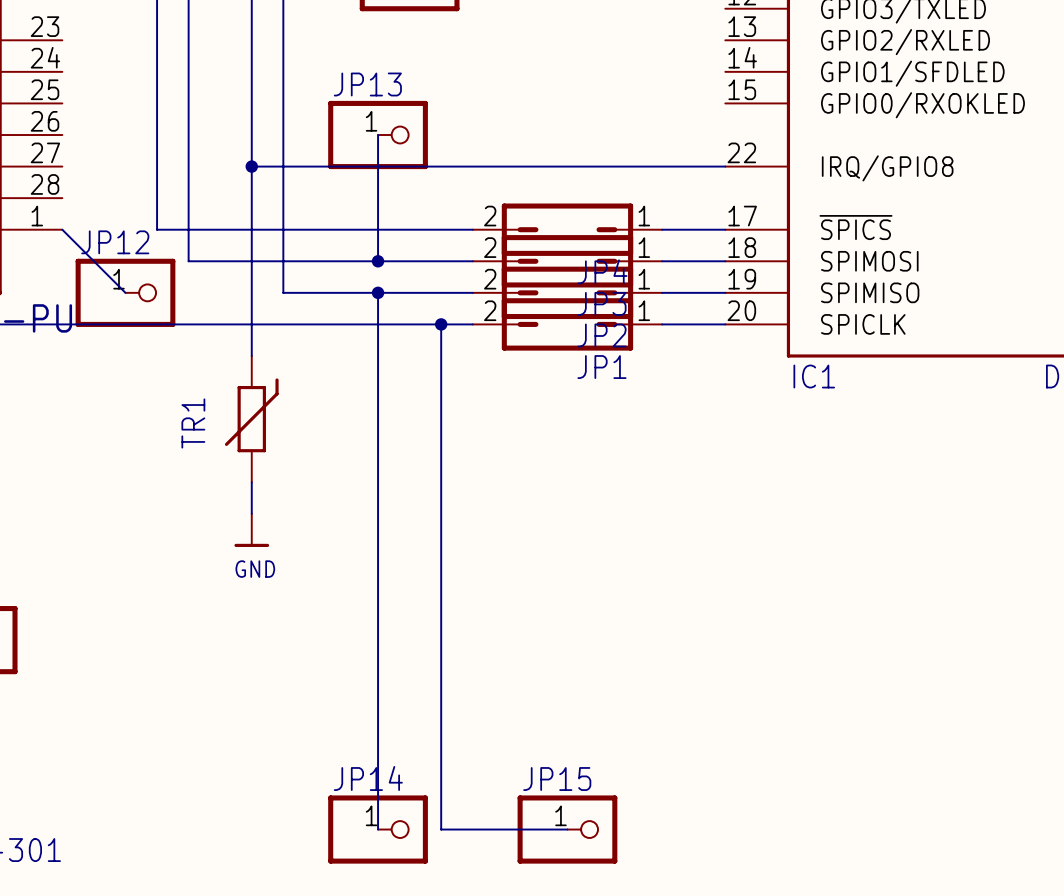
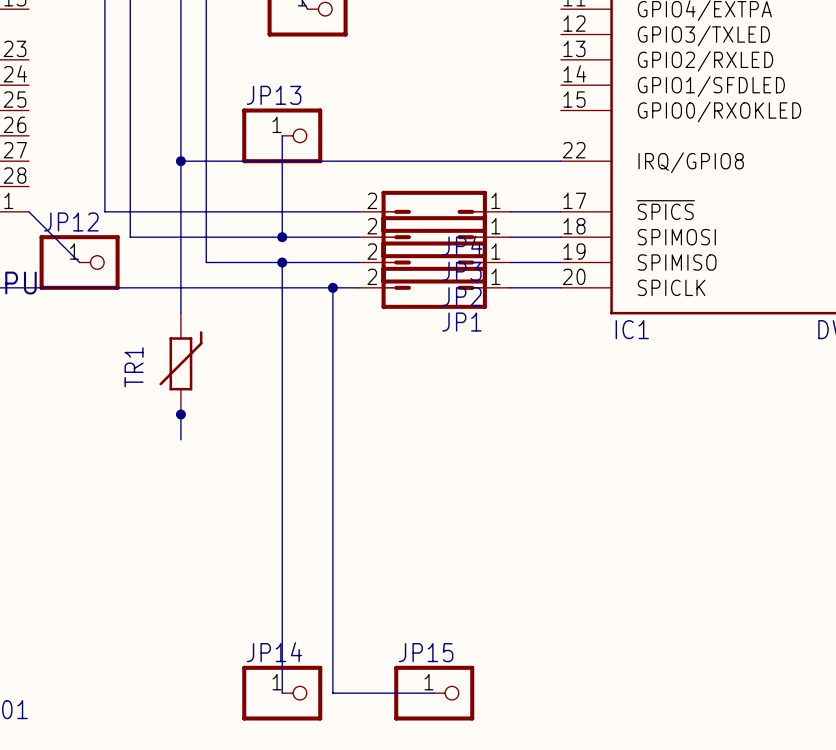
junction: none -> (180, 414)
power symbol: GND (251, 530) -> none

